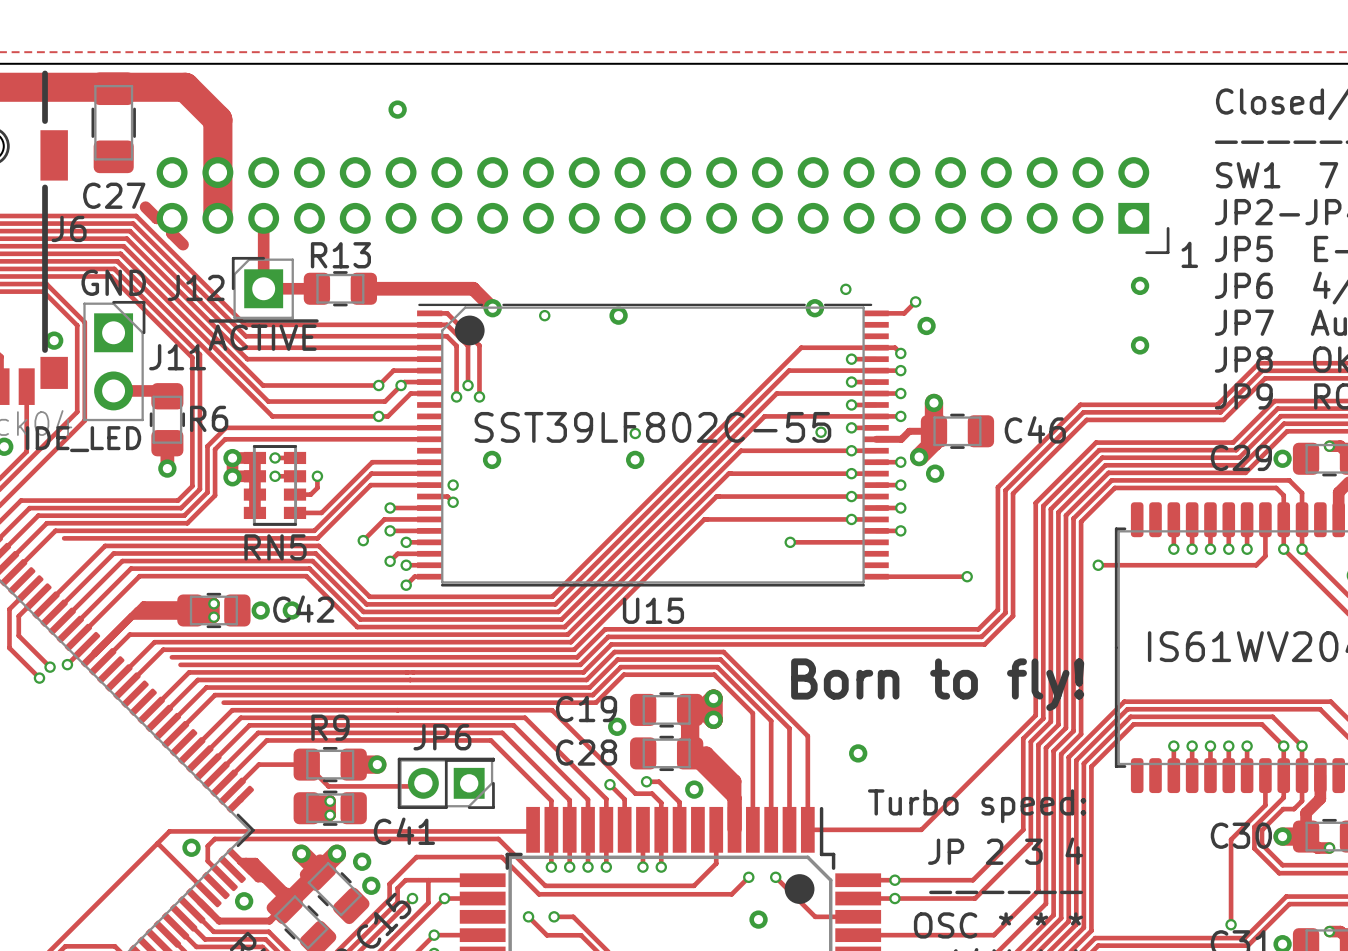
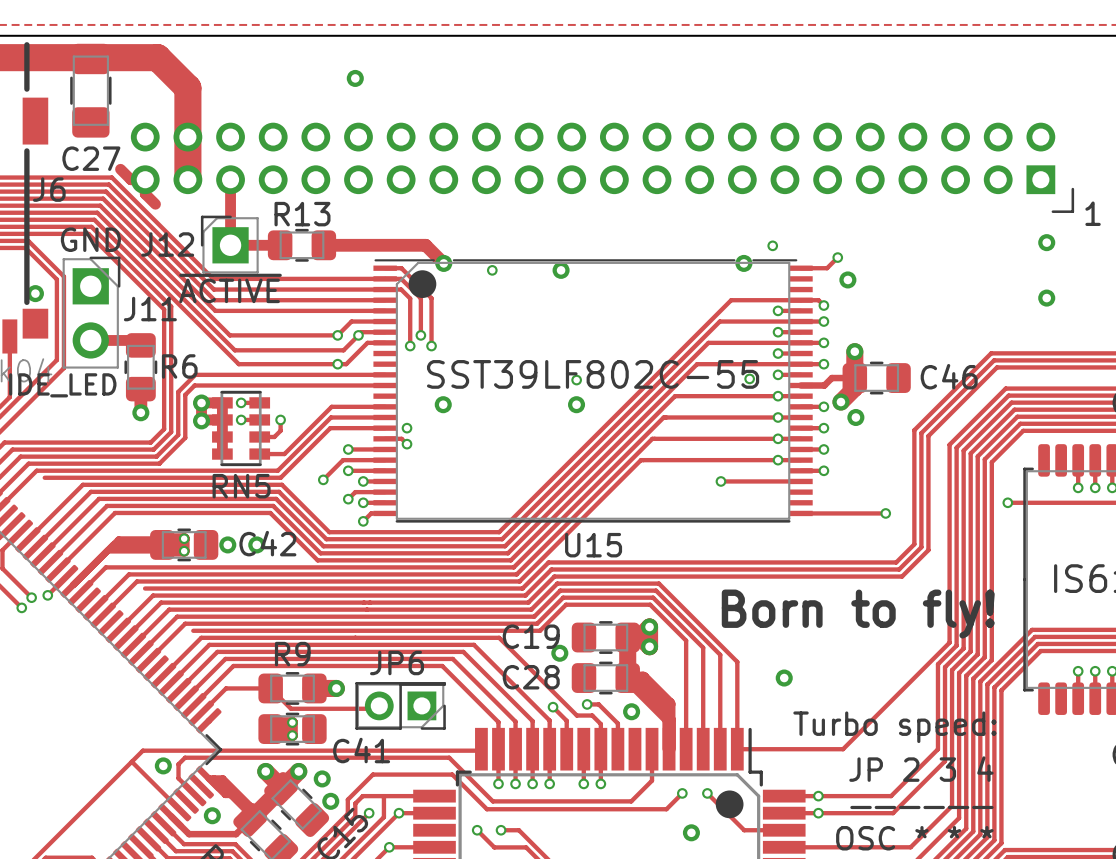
track: none -> (153, 595) (118, 630)

